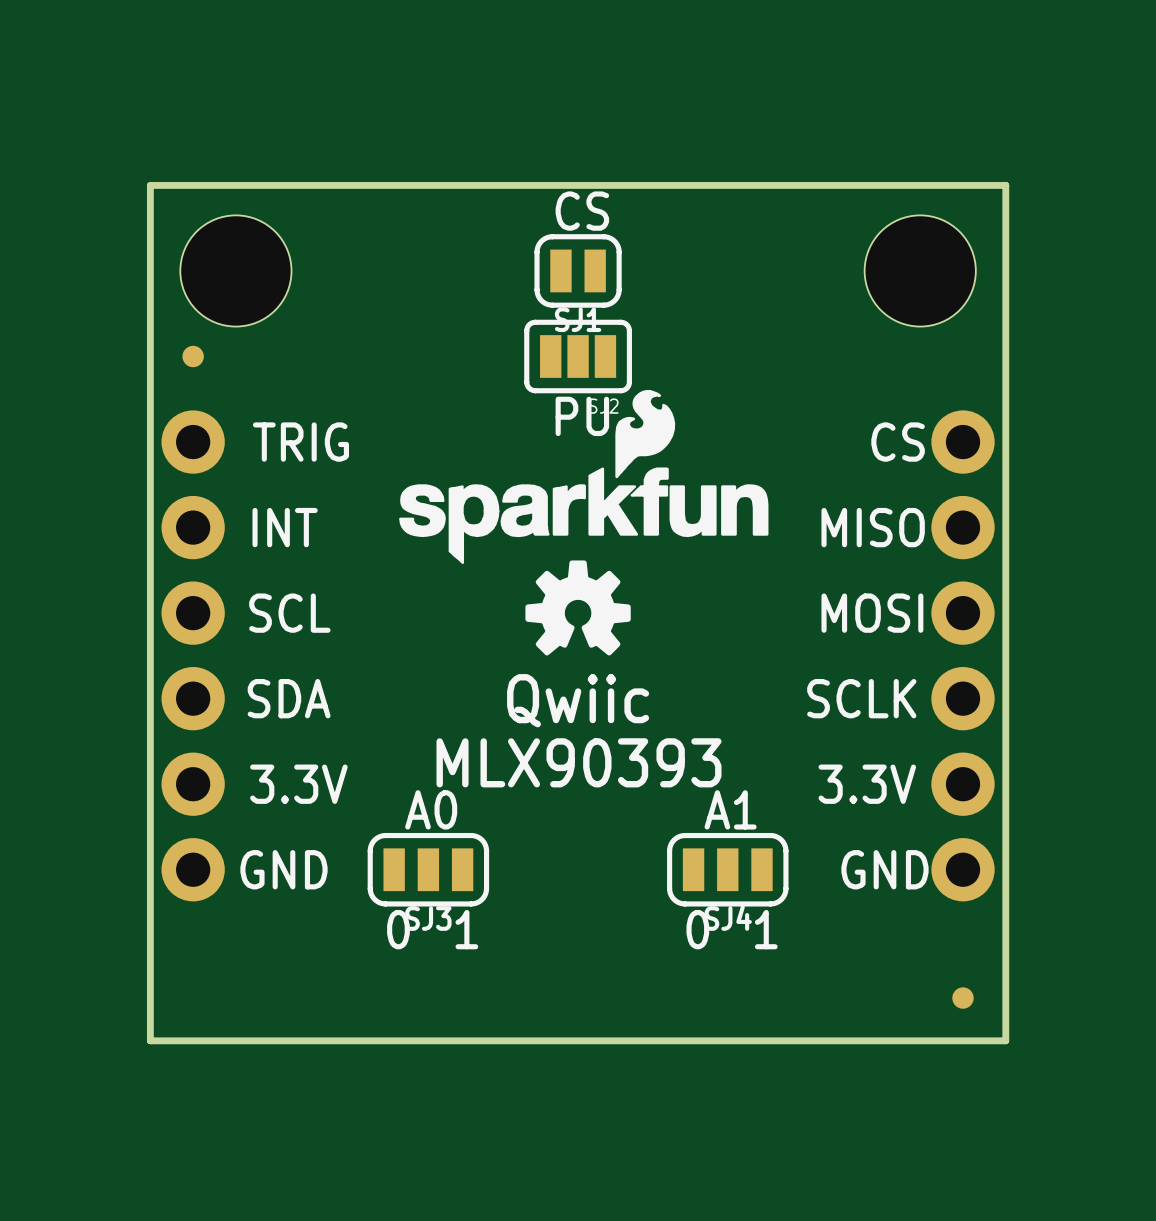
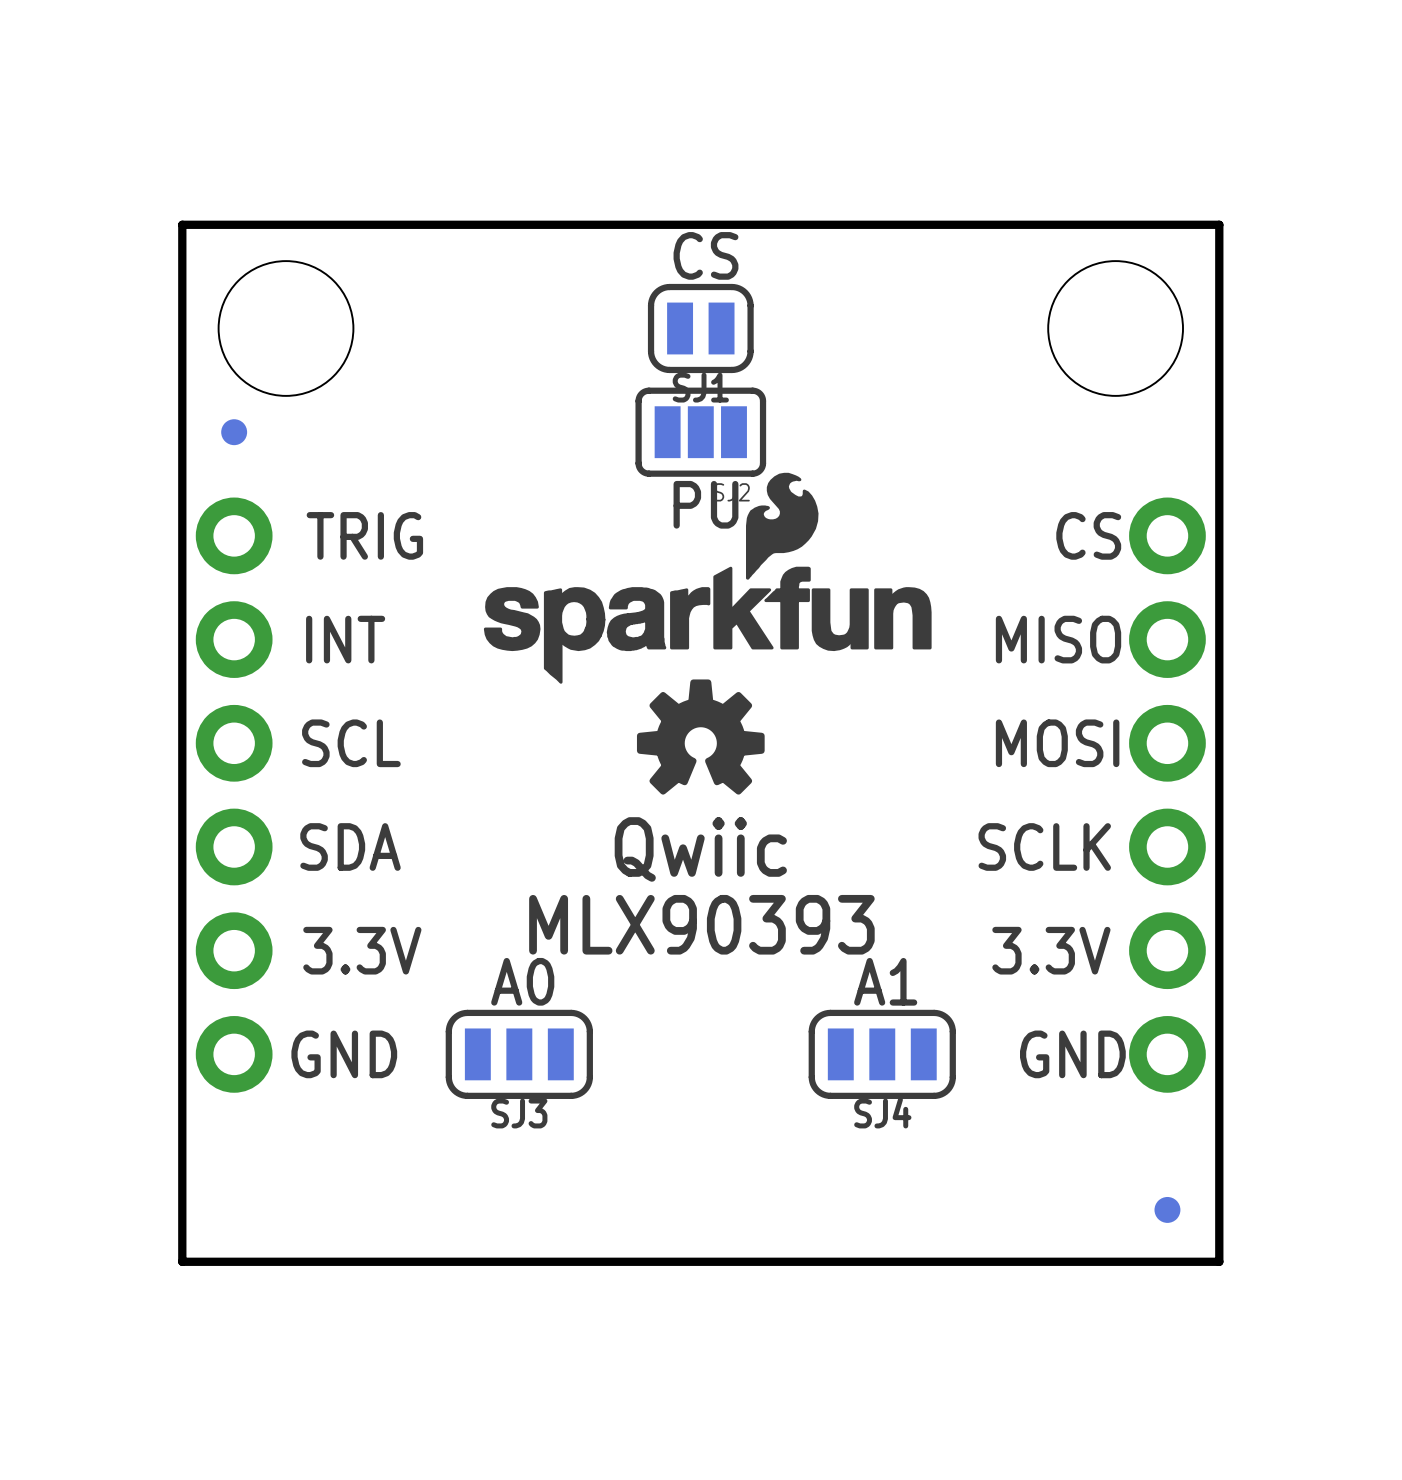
text: 0 (398, 929) -> none
text: 1 (466, 929) -> none
text: 0 (697, 929) -> none
text: 1 (766, 929) -> none

